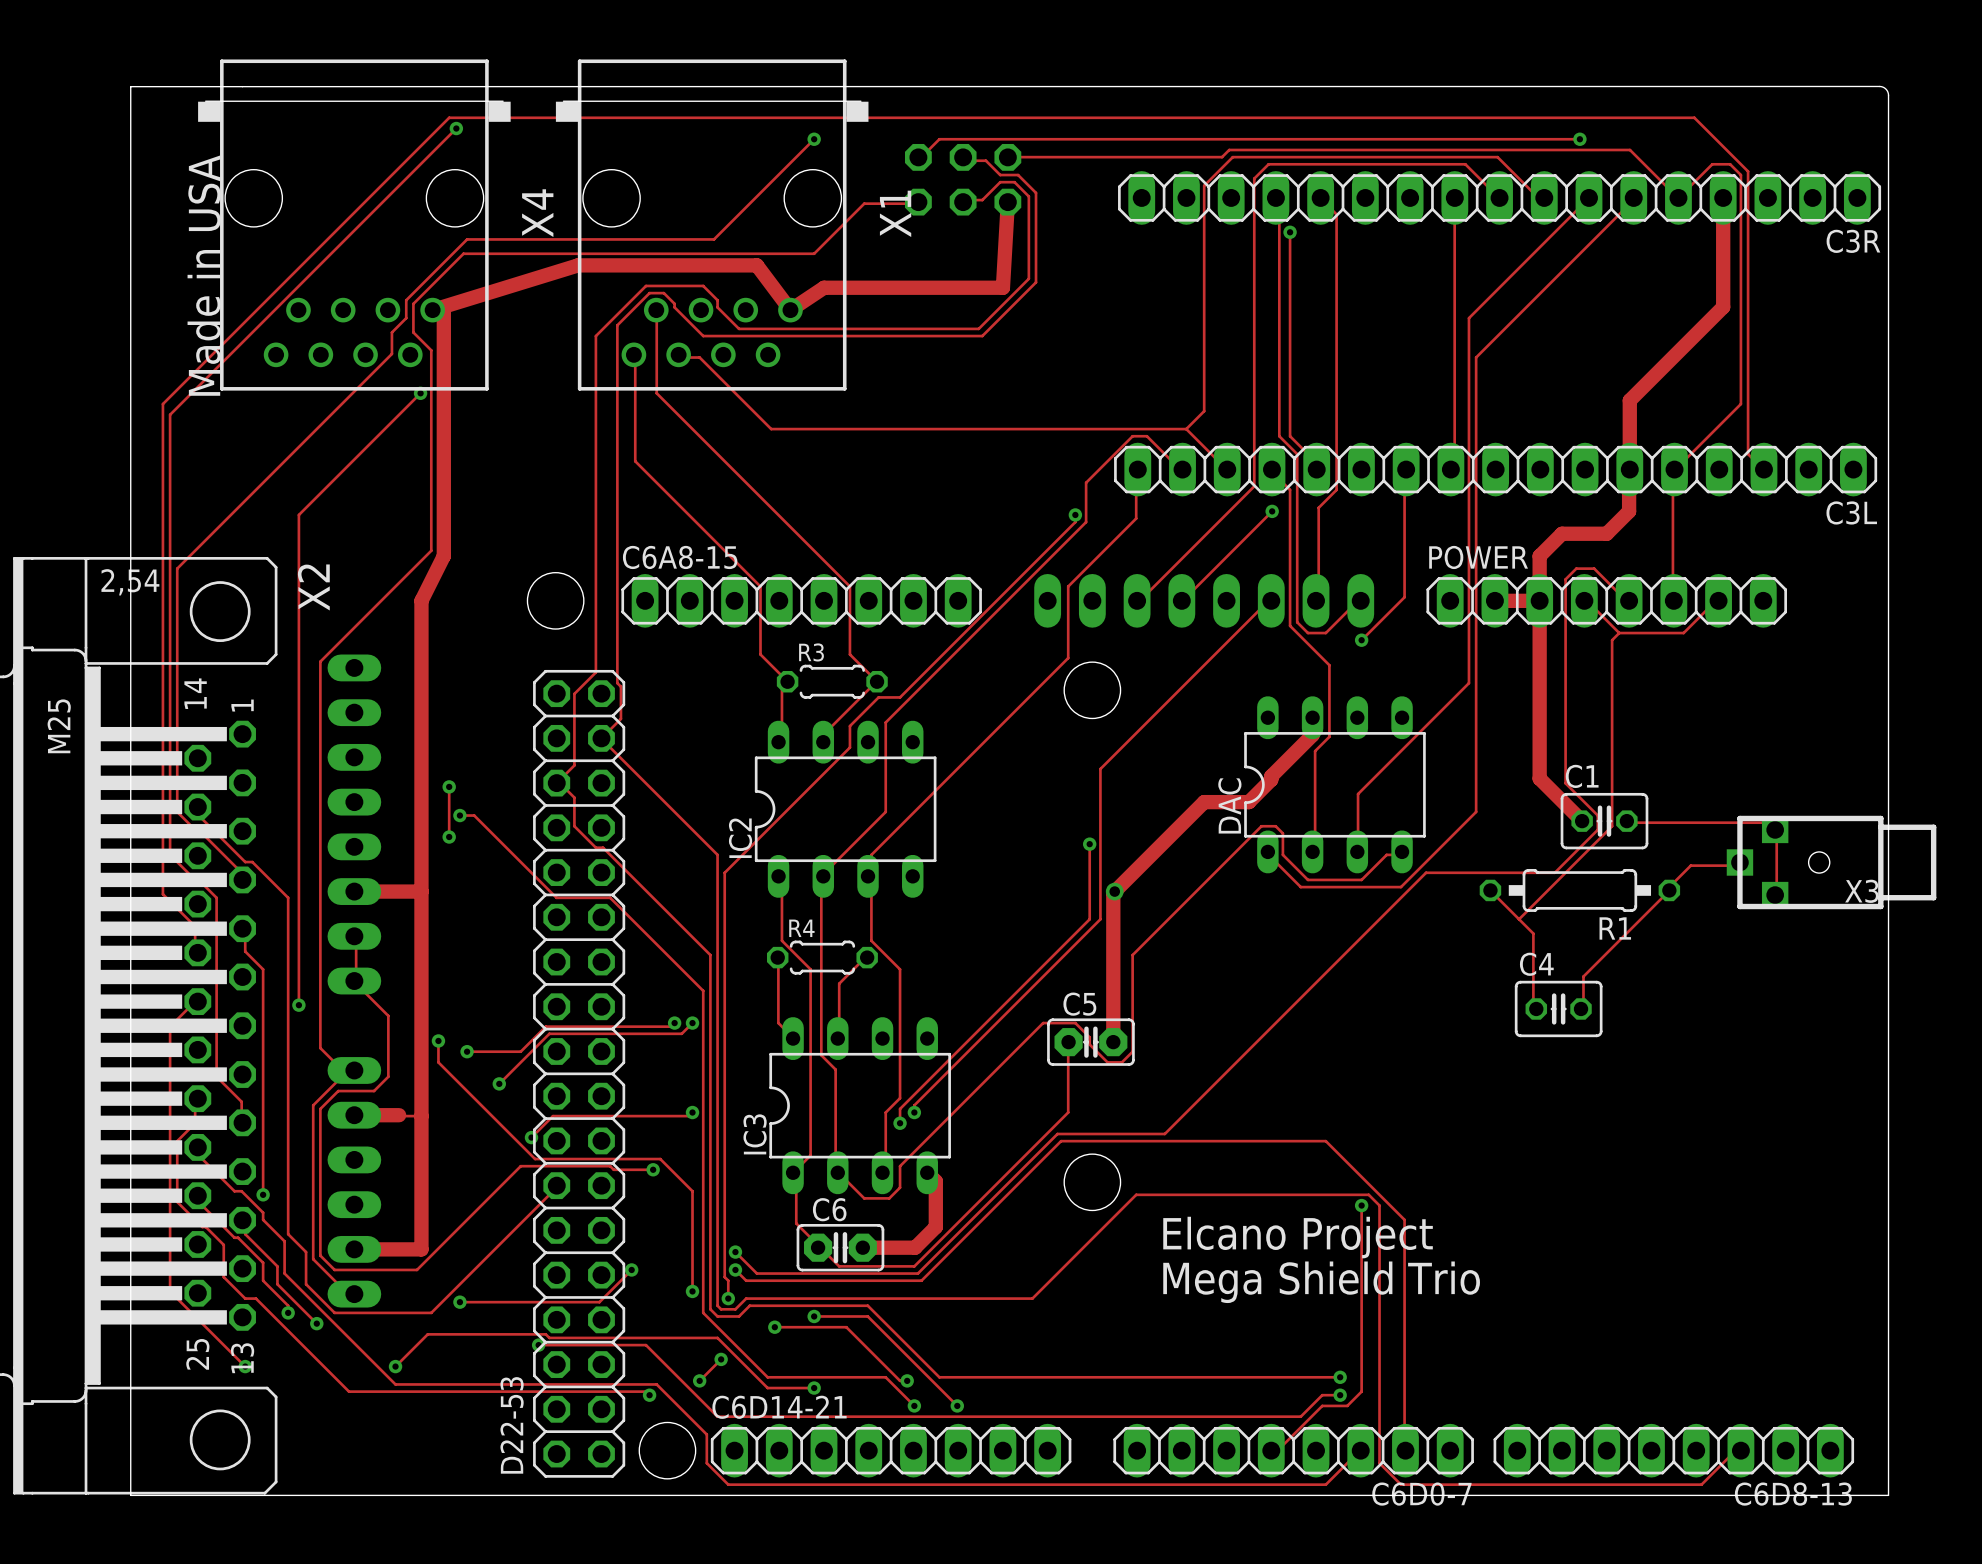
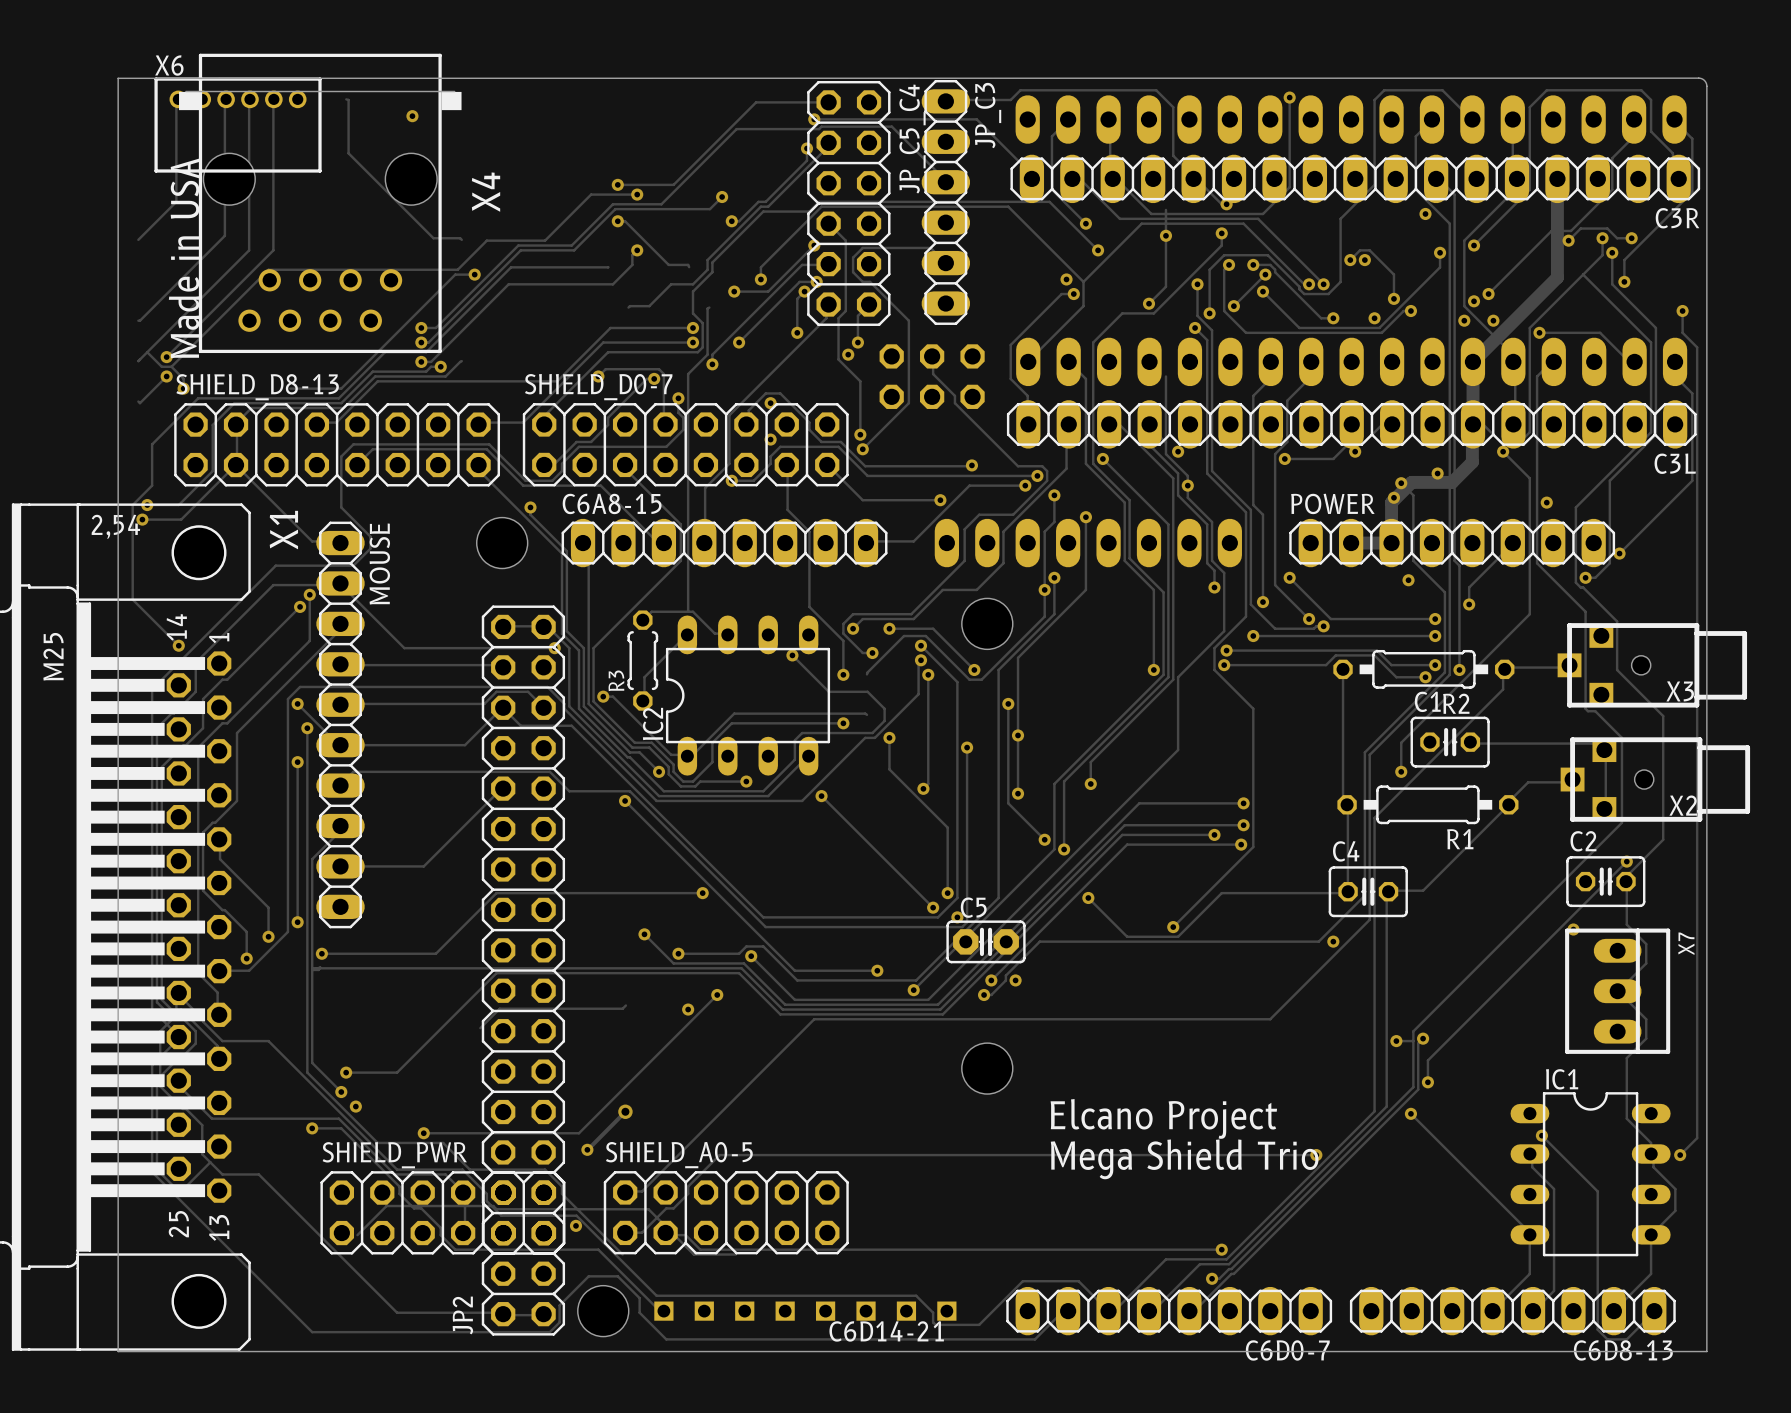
track: none -> (1289, 97) (1289, 187) (1262, 213) (1151, 213) (1109, 171) (1110, 121) (1108, 119)
via: none -> (1289, 97)
track: none -> (178, 99) (176, 99) (176, 201) (138, 239)
track: none -> (226, 99) (224, 235) (138, 320)
track: none -> (249, 99) (249, 250) (138, 361)
track: none -> (273, 99) (273, 250) (166, 357)
track: none -> (346, 99) (348, 99) (348, 153) (433, 238) (460, 238) (461, 239)
track: none -> (945, 101) (1010, 99) (1020, 90) (1156, 90) (1173, 107) (1173, 155) (1221, 204) (1226, 204)
track: none -> (828, 102) (756, 102) (673, 184) (617, 184)
track: (456, 128) (170, 414) (170, 854) (216, 897) (216, 1076) (241, 1101) (242, 1122) -> (309, 594) (309, 640) (227, 723) (222, 723) (198, 747) (198, 973) (217, 992) (217, 1014) (219, 1014)
track: none -> (814, 119) (976, 119) (1028, 171)
via: none -> (814, 119)
track: none -> (1068, 119) (1051, 136) (1051, 189) (1085, 223)
part: none -> (1351, 119)
track: none -> (1431, 119) (1415, 136) (1415, 189) (1449, 223) (1449, 674) (1369, 754) (1369, 919) (1270, 1019) (814, 1019) (642, 1191) (625, 1192)
track: none -> (1472, 119) (1442, 90) (1384, 90) (1374, 99) (1374, 184) (1340, 218) (1340, 281) (1328, 294) (1304, 294) (1267, 255) (1224, 255) (1209, 269) (1209, 313)
track: none -> (1512, 119) (1512, 192) (1464, 240) (1464, 306) (1512, 354) (1513, 361) (1515, 361) (1515, 412) (1513, 413)
track: none -> (1634, 119) (1634, 136) (1612, 158) (1612, 189) (1571, 230) (1551, 230) (1488, 294)
track: none -> (1674, 119) (1692, 138) (1692, 192) (1624, 260) (1624, 281)
X6: none -> (238, 125)
track: (814, 139) (713, 239) (467, 239) (406, 300) (406, 318) (391, 332) (391, 353) (177, 568) (177, 811) (191, 826) (195, 826) (241, 872) (242, 879) -> none
via: (814, 139) -> none
track: (1579, 139) (939, 139) (921, 157) (918, 157) -> none
via: (1579, 139) -> none
track: (963, 157) (964, 160) (985, 160) (1000, 175) (1018, 175) (1036, 192) (1036, 282) (982, 336) (703, 336) (674, 307) (674, 303) (663, 293) (649, 293) (617, 325) (617, 683) (620, 686) (620, 718) (601, 738) (717, 854) (717, 1305) (721, 1309) (735, 1309) (746, 1298) (1032, 1298) (1136, 1194) (1368, 1194) (1379, 1205) (1379, 1463) (1400, 1484) (1701, 1484) (1733, 1452) (1740, 1452) (1740, 1450) -> none
track: (1007, 157) (1222, 157) (1229, 149) (1630, 149) (1678, 197) (1712, 164) (1730, 164) (1740, 175) (1740, 404) (1672, 472) (1673, 600) -> (1469, 604) (1469, 587) (1512, 543)
track: none -> (828, 142) (826, 143) (826, 148) (768, 206) (760, 206) (707, 260) (707, 269) (693, 284) (671, 284) (649, 306) (628, 307)
track: none -> (807, 148) (807, 160) (765, 201) (758, 201) (739, 221) (731, 221)
via: none -> (807, 148)
part position: (963, 179) -> (932, 376)
track: none -> (1068, 171) (1073, 172) (1119, 218) (1258, 218) (1323, 284)
track: none -> (1432, 171) (1454, 194) (1454, 560) (1459, 565) (1459, 669)
track: none -> (1674, 171) (1672, 170) (1672, 153) (1651, 131) (1651, 99) (1641, 90) (1546, 90) (1529, 107) (1529, 189) (1474, 245)
track: (1275, 197) (1279, 200) (1279, 436) (1297, 454) (1297, 622) (1307, 633) (1325, 633) (1358, 600) (1360, 600) -> none
track: (1320, 197) (1336, 214) (1336, 489) (1318, 507) (1318, 600) (1316, 600) -> none
track: (1454, 197) (1454, 464) (1450, 469) -> none
track: (1499, 197) (1465, 164) (1268, 164) (1254, 178) (1254, 486) (1139, 600) (1137, 600) -> none
track: (1544, 197) (1536, 196) (1497, 157) (1232, 157) (1204, 185) (1204, 411) (1186, 429) -> none
track: (1589, 197) (1468, 318) (1468, 683) (1358, 794) (1357, 851) -> none
track: (1633, 197) (1476, 357) (1476, 811) (1400, 887) (1300, 887) (1268, 854) (1267, 851) -> none
track: none -> (945, 182) (891, 126) (736, 129) (661, 204) (612, 204) (571, 245) (518, 245) (435, 327) (421, 327)
track: (918, 202) (917, 203) (864, 203) (814, 253) (463, 253) (413, 303) (413, 332) (431, 350) (431, 550) (320, 661) (320, 1048) (345, 1073) (313, 1105) (313, 1259) (345, 1291) (352, 1291) (354, 1294) -> none
track: (963, 202) (964, 200) (982, 200) (1000, 182) (1014, 182) (1028, 196) (1028, 278) (978, 328) (739, 328) (717, 307) (717, 300) (703, 285) (645, 285) (595, 336) (595, 672) (574, 693) (574, 765) (556, 783) (560, 783) (574, 797) (574, 826) (595, 847) (603, 847) (710, 955) (710, 1309) (717, 1316) (739, 1316) (749, 1305) (867, 1305) (939, 1377) (1340, 1377) -> none
track: (1007, 202) (1002, 287) (824, 287) (790, 310) (756, 265) (578, 265) (432, 310) (443, 310) (443, 556) (421, 600) (421, 1249) (354, 1249) -> none
via: none -> (617, 184)
track: none -> (637, 194) (591, 194) (545, 240) (486, 240) (457, 269) (268, 269) (171, 366)
via: none -> (637, 194)
track: none -> (722, 197) (709, 209) (615, 209) (574, 250) (520, 250) (428, 342) (421, 342)
via: none -> (722, 197)
JP_C3: none -> (945, 202)
X1: (712, 225) -> none
JP_C5_C4: none -> (848, 203)
via: none -> (1226, 204)
via position: (1290, 232) -> (1165, 235)
via: none -> (1425, 213)
track: none -> (617, 221) (625, 221) (668, 264) (688, 264) (689, 267)
via: none -> (617, 221)
via: none -> (731, 221)
track: none -> (828, 223) (845, 240) (845, 311) (838, 318) (838, 359) (860, 381) (860, 434)
via: none -> (1085, 223)
track: none -> (1221, 233) (1221, 245) (1153, 313) (1122, 313) (1093, 342) (1093, 463) (1129, 500) (1129, 558) (1163, 592) (1163, 674) (1054, 783) (1054, 849) (913, 990)
via: none -> (1221, 233)
track: none -> (1602, 238) (1602, 255) (1529, 327) (1529, 432) (1520, 441) (1500, 441) (1474, 415) (1472, 361)
via: none -> (1602, 238)
track: none -> (1631, 238) (1617, 238) (1607, 228) (1580, 228) (1568, 240)
via: none -> (1631, 238)
via: none -> (1568, 240)
track: none -> (814, 245) (768, 291) (734, 291)
via: none -> (814, 245)
via: none -> (1474, 245)
track: none -> (637, 250) (632, 255) (632, 264) (612, 284) (508, 284) (431, 361) (421, 361)
via: none -> (637, 250)
track: none -> (1098, 250) (1049, 201) (819, 201) (809, 211) (763, 211) (712, 262) (712, 272) (693, 291) (693, 313) (702, 323) (702, 347) (697, 352) (608, 352) (545, 415) (544, 424)
via: none -> (1098, 250)
track: none -> (1440, 252) (1440, 267) (1379, 327) (1299, 327) (1262, 291)
via: none -> (1440, 252)
track: none -> (1612, 252) (1612, 284) (1655, 327) (1655, 434) (1609, 480) (1609, 563) (1595, 577) (1585, 577)
via: none -> (1612, 252)
track: none -> (1350, 260) (1360, 250) (1369, 250) (1393, 274) (1393, 298)
via: none -> (1350, 260)
via: none -> (1364, 260)
track: none -> (945, 263) (930, 247) (862, 247) (853, 257) (853, 272) (862, 281) (870, 281) (908, 320) (908, 403) (862, 449)
track: none -> (828, 264) (802, 264) (712, 354) (712, 364)
track: none -> (1229, 264) (1224, 269) (1224, 311) (1246, 332) (1381, 332) (1403, 311) (1410, 311)
via: none -> (1229, 264)
track: none -> (1253, 264) (1270, 264) (1275, 272) (1321, 318) (1333, 318)
via: none -> (1253, 264)
track: none -> (608, 267) (511, 267) (426, 352) (384, 352) (338, 398) (198, 398) (152, 444) (152, 485) (132, 505) (132, 599) (178, 645)
track: none -> (474, 274) (455, 274) (341, 388) (290, 388)
via: none -> (474, 274)
track: none -> (1265, 274) (1233, 306)
via: none -> (1265, 274)
track: none -> (1583, 274) (1651, 342) (1651, 432) (1575, 507) (1575, 582) (1617, 621) (1617, 669) (1663, 716) (1663, 839) (1626, 876) (1626, 881) (1626, 924) (1646, 944) (1646, 963) (1617, 991) (1646, 1019) (1646, 1038) (1626, 1058) (1626, 1118) (1651, 1142) (1653, 1167) (1675, 1189) (1675, 1210) (1651, 1234)
track: none -> (760, 279) (760, 267) (821, 206) (1008, 206) (1083, 281)
via: none -> (760, 279)
via: none -> (1066, 279)
track: (656, 310) (656, 393) (849, 586) (849, 654) (877, 681) (824, 733) (823, 742) -> none
track: none -> (816, 281) (799, 281) (739, 342)
via: none -> (816, 281)
track: none -> (1083, 281) (1083, 306) (1028, 361)
track: none -> (1083, 281) (1141, 223) (1243, 223) (1304, 284) (1309, 284)
via: none -> (1624, 281)
track: none -> (1197, 284) (1197, 315) (1212, 330) (1212, 471) (1250, 509) (1250, 604) (1275, 628) (1313, 628) (1316, 626) (1323, 626)
via: none -> (1197, 284)
via: none -> (1309, 284)
via: none -> (1323, 284)
track: (1290, 317) (1290, 416) -> (1165, 286) (1148, 303)
via: none -> (734, 291)
track: none -> (804, 291) (797, 298) (797, 332)
via: none -> (804, 291)
via: none -> (1262, 291)
track: none -> (1073, 294) (1061, 294) (1010, 344) (1010, 378) (1027, 395) (1028, 413)
via: none -> (1073, 294)
via: none -> (1488, 294)
via: none -> (1393, 298)
via: none -> (1474, 301)
track: none -> (828, 304) (826, 306) (826, 318) (729, 415) (729, 463) (705, 488) (704, 543)
track: none -> (869, 304) (857, 315) (857, 342)
via: none -> (1148, 303)
via: none -> (1233, 306)
track: none -> (709, 307) (707, 308) (707, 354) (688, 374) (688, 611)
via: none -> (1410, 311)
track: none -> (1682, 311) (1682, 332) (1697, 347) (1697, 1138) (1680, 1155)
via: none -> (1682, 311)
via: none -> (1209, 313)
via: none -> (1333, 318)
via: none -> (1374, 318)
track: (633, 354) (635, 461) (760, 586) (760, 654) (787, 681) (781, 686) (781, 740) (778, 742) -> none
track: (678, 354) (681, 357) (699, 357) (771, 429) (1186, 429) -> none
via: none -> (1464, 320)
via: none -> (1493, 320)
via: none -> (421, 327)
track: none -> (693, 327) (610, 327) (557, 381) (377, 381) (336, 422) (317, 422) (316, 424)
via: none -> (693, 327)
track: none -> (1195, 327) (1207, 340) (1207, 473) (1246, 512) (1246, 616) (1214, 648) (1214, 669) (1253, 708) (1253, 847) (1173, 927)
via: none -> (1195, 327)
via: none -> (797, 332)
track: none -> (1539, 332) (1600, 332) (1626, 359) (1634, 359) (1634, 361)
via: none -> (1539, 332)
via: none -> (421, 342)
track: none -> (693, 342) (603, 342) (523, 422) (479, 422) (478, 424)
via: none -> (693, 342)
via: none -> (739, 342)
via: none -> (857, 342)
track: none -> (147, 352) (161, 366) (171, 366)
via: none -> (848, 354)
track: (420, 393) (298, 514) (298, 1005) -> none
via: (420, 393) -> none
track: none -> (932, 356) (933, 374) (954, 395) (954, 403) (1018, 466) (1042, 466) (1047, 471) (1047, 480) (1013, 514) (979, 514) (964, 529) (964, 560) (911, 614) (853, 614) (843, 623) (843, 633) (862, 653) (872, 653)
via: none -> (166, 357)
track: none -> (461, 361) (445, 376) (375, 376) (343, 408) (251, 408) (236, 424) (236, 465)
via: none -> (421, 361)
track: none -> (1068, 361) (1085, 378) (1085, 463) (1124, 502) (1124, 560) (1153, 589) (1153, 669)
track: none -> (1270, 361) (1270, 378) (1253, 395) (1253, 505) (1262, 514) (1262, 602)
track: none -> (1311, 361) (1309, 361) (1309, 378) (1287, 400) (1287, 441) (1275, 454) (1275, 585) (1309, 619)
part: none -> (1351, 361)
track: none -> (1553, 361) (1537, 376) (1537, 563) (1585, 611) (1585, 708) (1588, 711) (1595, 711) (1621, 737) (1621, 822) (1413, 1031) (1413, 1087) (1231, 1269) (1229, 1269) (1219, 1278) (1212, 1278)
track: none -> (1675, 361) (1675, 376) (1692, 393) (1692, 480) (1619, 553)
via: none -> (712, 364)
track: none -> (171, 366) (183, 378) (183, 388)
track: none -> (440, 366) (431, 366) (426, 371) (372, 371) (341, 403) (234, 403) (212, 425) (212, 471) (178, 505) (147, 505)
via: none -> (440, 366)
track: none -> (166, 376) (139, 403) (138, 401)
via: none -> (166, 376)
track: none -> (598, 376) (605, 369) (659, 369) (663, 374) (663, 422) (665, 424)
via: none -> (598, 376)
track: none -> (654, 378) (646, 378) (608, 417) (608, 425) (591, 441) (576, 441) (554, 463) (544, 464)
via: none -> (654, 378)
via: none -> (183, 388)
track: (1186, 429) (1227, 469) -> none
track: (1290, 436) (1315, 461) (1316, 469) -> (1165, 394) (1165, 442)
track: none -> (678, 398) (678, 412) (683, 417) (683, 429) (666, 446) (579, 446) (562, 463) (562, 471) (552, 480) (525, 480) (489, 444) (353, 444) (341, 456) (341, 507) (370, 536) (370, 548) (353, 565) (275, 565) (152, 689) (152, 1009) (178, 1036) (178, 1038) (152, 1065) (152, 1172) (312, 1332) (549, 1332) (559, 1322) (559, 1305) (588, 1276) (617, 1276) (639, 1298) (639, 1312) (666, 1339) (1034, 1339) (1061, 1312) (1068, 1311)
via: none -> (678, 398)
via: none -> (770, 403)
track: none -> (1068, 413) (1066, 415) (1066, 468) (1003, 531) (1003, 563) (976, 589) (942, 589) (913, 619) (862, 619) (853, 628)
track: none -> (1109, 413) (1173, 478) (1173, 679) (1090, 762) (1090, 783)
track: none -> (1149, 413) (1151, 415) (1151, 446) (1178, 473) (1178, 495) (1207, 524) (1207, 563) (1214, 570) (1214, 587)
track: none -> (1392, 413) (1364, 441) (1350, 441) (1333, 458) (1284, 458)
track: none -> (746, 424) (748, 422) (748, 410) (765, 393) (780, 393) (809, 422) (809, 429) (821, 441) (840, 441) (865, 466) (976, 466)
track: (1137, 469) (1136, 472) (1136, 518) (1068, 586) (1068, 658) (871, 854) (871, 872) (868, 876) (871, 876) (871, 940) (900, 969) (900, 1098) (885, 1112) (885, 1169) (882, 1172) -> none
track: (1182, 469) (1146, 436) (1132, 436) (1086, 482) (1086, 522) (885, 722) (885, 811) (821, 876) (821, 1055) (835, 1069) (835, 1169) (864, 1198) (889, 1198) (900, 1187) (900, 1166) (1043, 1023) (1075, 1023) (1089, 1037) (1089, 1044) (1107, 1062) (1121, 1062) (1132, 1051) (1132, 955) (1261, 826) (1275, 826) (1282, 833) (1282, 854) (1307, 879) (1361, 879) (1386, 854) (1400, 854) (1402, 851) -> none
track: (1406, 469) (1404, 472) (1404, 597) (1361, 640) -> none
track: (1763, 469) (1748, 454) (1748, 171) (1694, 117) (449, 117) (162, 404) (162, 894) (195, 926) (195, 951) (197, 952) -> none
via: none -> (860, 434)
via: none -> (770, 439)
SHIELD_D8-13: none -> (337, 444)
SHIELD_D0-7: none -> (685, 444)
via: none -> (862, 449)
via: none -> (1178, 451)
via: none -> (1355, 451)
track: none -> (1503, 451) (1529, 478) (1529, 614) (1401, 742) (1401, 771)
via: none -> (1503, 451)
track: (1290, 502) (1290, 625) (1329, 665) (1329, 736) (1315, 751) (1315, 851) (1312, 851) -> (1165, 454) (1187, 475) (1187, 497) (1212, 522) (1212, 560) (1224, 572) (1224, 631) (1178, 677) (1178, 750) (928, 999) (794, 999) (751, 956)
track: none -> (1102, 458) (1168, 524) (1168, 677) (1064, 781) (1064, 849)
via: none -> (1102, 458)
via: none -> (1284, 458)
track: (1272, 511) (1181, 600) -> none
via: (1272, 511) -> none
track: none -> (236, 465) (312, 541) (338, 541) (340, 543)
track: none -> (236, 465) (181, 519) (142, 519)
track: none -> (357, 465) (372, 449) (486, 449) (523, 485) (600, 485) (656, 541) (663, 541) (663, 543)
track: none -> (478, 465) (479, 471) (562, 553) (562, 633) (579, 650) (579, 708) (663, 791) (763, 791) (794, 759) (794, 740) (802, 733) (872, 733) (884, 720) (884, 708) (867, 691) (828, 691) (792, 655)
track: none -> (625, 464) (627, 466) (627, 471) (680, 524) (680, 560) (593, 648) (593, 701) (634, 742) (651, 742) (673, 764) (673, 771) (683, 781) (693, 781) (712, 762) (712, 742) (731, 723) (843, 723)
track: none -> (786, 464) (787, 509) (809, 531) (809, 606) (843, 640) (843, 674)
track: none -> (827, 464) (862, 500) (940, 500)
track: (1075, 514) (1075, 522) (900, 697) (878, 697) (849, 726) (849, 747) (724, 872) (724, 1277) (728, 1280) (728, 1298) -> none
via: none -> (1437, 473)
track: none -> (1037, 475) (867, 475) (838, 446) (780, 446) (770, 456) (770, 463) (753, 480) (731, 480)
via: none -> (1037, 475)
via: none -> (731, 480)
track: none -> (1401, 483) (1413, 495) (1413, 560) (1444, 592) (1444, 672) (1364, 752) (1364, 895) (1318, 941) (1039, 941) (1005, 975) (1005, 980) (991, 994) (984, 994)
via: none -> (1401, 483)
track: none -> (1025, 485) (969, 485) (913, 541) (867, 541) (866, 543)
via: none -> (1025, 485)
via: none -> (1187, 485)
track: none -> (1054, 495) (1054, 522) (1044, 531) (1044, 616) (981, 679) (969, 679) (925, 636) (904, 636) (866, 674)
via: none -> (1054, 495)
via: none -> (1393, 497)
via: none -> (940, 500)
via: none -> (1546, 502)
via: none -> (147, 505)
track: none -> (530, 507) (530, 514) (566, 551) (566, 631) (583, 648) (583, 706) (629, 752) (639, 752) (659, 771)
via: none -> (530, 507)
track: none -> (1085, 517) (1085, 589) (1018, 657) (1018, 793)
via: none -> (1085, 517)
via: none -> (142, 519)
X2 name: X2 (313, 587) -> X1 (283, 530)
track: none -> (583, 543) (588, 548) (588, 703) (632, 747) (649, 747) (668, 767) (668, 774) (680, 786) (695, 786) (700, 781) (746, 781)
track: (1271, 600) (1268, 600) (1100, 769) (1100, 919) (914, 1105) (914, 1112) -> none
track: (1584, 600) (1587, 600) (1619, 633) -> none
track: (1629, 600) (1626, 600) (1594, 568) (1576, 568) (1565, 579) (1565, 783) (1597, 815) (1597, 829) (1554, 872) (1426, 872) (1164, 1133) (1057, 1133) (917, 1273) (756, 1273) (735, 1252) -> none
track: (1718, 600) (1715, 600) (1683, 633) (1619, 633) -> none
track: (1539, 601) (1539, 778) (1582, 821) -> none
via: none -> (1619, 553)
track: (1619, 633) (1612, 640) (1612, 826) (1519, 919) -> none
track: none -> (1054, 577) (1054, 614) (998, 669) (998, 897) (916, 980) (797, 980) (763, 946) (746, 946) (739, 953) (678, 953)
via: none -> (1054, 577)
track: none -> (1289, 577) (1330, 619) (1435, 619)
via: none -> (1289, 577)
via: none -> (1585, 577)
via position: (1361, 640) -> (1214, 587)
via: none -> (1408, 580)
R3 name position: R3 (811, 652) -> R3 (616, 680)
via: none -> (1044, 589)
via: none -> (309, 594)
via: none -> (1262, 602)
via: none -> (1469, 604)
track: none -> (300, 606) (227, 679) (222, 679) (203, 699) (203, 728) (161, 767) (161, 999) (171, 1009) (181, 1009) (217, 1045) (217, 1058) (219, 1058)
via: none -> (300, 606)
R3 rotation: 0° (832, 681) -> 90° clockwise (642, 660)
R3 position: (832, 681) -> (642, 660)
via: none -> (1309, 619)
via: none -> (1435, 619)
track: none -> (642, 620) (651, 611) (693, 611) (714, 633) (727, 634)
track: none -> (340, 623) (338, 623) (338, 631) (237, 733) (237, 800) (203, 832) (203, 890) (246, 931) (246, 958)
via: none -> (1323, 626)
track: none -> (503, 626) (542, 626) (545, 628) (549, 628) (569, 648) (569, 706) (659, 796) (768, 796) (808, 756)
via: none -> (853, 628)
track: none -> (889, 628) (933, 628) (974, 669)
via: none -> (889, 628)
track: none -> (687, 634) (644, 677) (644, 699) (642, 701)
track: none -> (1253, 636) (1435, 636)
via: none -> (1253, 636)
via: none -> (1435, 636)
via: none -> (178, 645)
track: none -> (921, 645) (957, 682) (957, 897) (937, 917) (763, 917) (571, 725) (520, 725) (503, 707) (465, 745) (338, 745) (297, 703)
via: none -> (921, 645)
track: none -> (554, 648) (404, 648) (340, 583) (338, 585) (273, 585) (195, 662) (195, 691) (156, 728) (156, 1002) (173, 1019) (183, 1019) (195, 1031) (195, 1043) (156, 1079) (156, 1169) (173, 1186) (186, 1186) (210, 1162)
via: none -> (554, 648)
track: (1312, 717) (1312, 735) (1271, 776) (1271, 779) (1248, 802) (1204, 802) (1113, 893) (1113, 1042) -> none
track: none -> (1226, 650) (1376, 650) (1391, 665) (1435, 665)
via: none -> (1226, 650)
via: none -> (872, 653)
via: none -> (792, 655)
track: none -> (921, 660) (918, 662) (918, 694) (874, 737) (865, 737) (802, 800) (656, 800) (564, 708) (564, 703) (547, 686) (300, 686) (287, 699) (287, 931) (249, 970) (219, 971)
via: none -> (921, 660)
track: none -> (340, 664) (501, 665) (503, 667)
track: none -> (1224, 665) (1326, 665) (1335, 655) (1374, 655) (1396, 677) (1425, 677)
via: none -> (1224, 665)
via: none -> (1435, 665)
track: none -> (1569, 665) (1568, 667) (1505, 667) (1503, 669) (1503, 689) (1374, 817) (1374, 1111) (1226, 1259) (1165, 1259) (1115, 1310) (1108, 1311) (1078, 1281) (1022, 1281) (979, 1324) (935, 1324) (933, 1322) (933, 1312) (916, 1295) (656, 1295) (576, 1215)
X3: none -> (1652, 665)
track: none -> (1343, 669) (1343, 800) (1347, 805) (1347, 893) (1221, 893) (1178, 936) (1127, 936) (1088, 897)
R2: none -> (1423, 669)
via: none -> (974, 669)
via: none -> (1153, 669)
via: none -> (1459, 669)
via: none -> (843, 674)
track: none -> (928, 674) (928, 783) (923, 788)
via: none -> (928, 674)
via: none -> (1425, 677)
track: none -> (603, 696) (612, 696) (671, 754) (687, 756) (693, 754) (734, 713) (866, 714)
via: none -> (603, 696)
via: none -> (297, 703)
track: none -> (1008, 703) (1008, 803) (1044, 839)
via: none -> (1008, 703)
track: none -> (340, 704) (484, 703) (496, 691) (528, 691) (543, 707)
DAC: (1334, 784) -> none
track: (449, 786) (449, 837) -> none
via: (449, 786) -> none
via: none -> (843, 723)
MOUSE: none -> (340, 724)
via: none -> (307, 728)
track: (197, 807) (198, 815) (245, 862) (252, 862) (288, 897) (288, 1234) (306, 1252) (306, 1284) (334, 1312) (431, 1312) (556, 1185) -> none
IC2 position: (845, 809) -> (748, 695)
via: none -> (1018, 735)
track: (459, 815) (474, 815) (556, 897) (610, 897) (703, 990) (703, 1312) (767, 1377) (885, 1377) (914, 1405) -> none
via: (459, 815) -> none
track: none -> (889, 737) (889, 769) (947, 827) (947, 893)
via: none -> (889, 737)
part: (354, 824) -> none
track: none -> (967, 747) (967, 922) (962, 927) (765, 927) (629, 791) (569, 791) (549, 771) (353, 771) (340, 785)
via: none -> (967, 747)
via: (449, 837) -> none
track: none -> (297, 762) (297, 922)
via: none -> (297, 762)
track: (1089, 844) (1089, 919) (900, 1108) (900, 1123) -> none
via: (1089, 844) -> none
via: none -> (659, 771)
via: none -> (1401, 771)
via: none -> (746, 781)
via: none -> (1090, 783)
track: none -> (503, 788) (423, 866) (340, 866)
via: none -> (923, 788)
track: (778, 876) (781, 876) (781, 940) (810, 969) (810, 1155) (793, 1172) (796, 1173) (796, 1223) (817, 1244) (818, 1247) (821, 1248) (839, 1266) (914, 1266) (1068, 1112) (1068, 1042) -> none
via: none -> (1018, 793)
track: none -> (821, 796) (933, 907)
via: none -> (821, 796)
track: none -> (625, 800) (794, 970) (877, 970)
via: none -> (625, 800)
track: none -> (1243, 803) (1139, 803) (937, 1004) (785, 1004) (743, 963) (673, 963) (644, 934)
via: none -> (1243, 803)
track: (1490, 890) (1533, 933) (1533, 1008) (1536, 1008) -> none
track: (354, 891) (421, 891) -> none
via: (1114, 891) -> none
X3 name: X3 (1861, 891) -> X2 (1683, 805)
track: none -> (340, 826) (338, 832) (312, 859) (312, 1062) (341, 1092)
track: none -> (1243, 825) (1124, 825) (940, 1009) (782, 1009) (741, 968) (312, 968)
via: none -> (1243, 825)
track: none -> (1214, 834) (1122, 834) (942, 1014) (780, 1014) (739, 973) (496, 973) (397, 1072) (346, 1072)
via: none -> (1214, 834)
track: (243, 929) (245, 930) (245, 951) (263, 969) (263, 1194) -> (220, 839) (220, 859) (268, 907) (268, 936)
via: none -> (1044, 839)
track: none -> (1241, 844) (1127, 844) (991, 980)
via: none -> (1241, 844)
track: (354, 936) (356, 937) (356, 980) (354, 981) (388, 1015) (388, 1076) (374, 1091) (338, 1091) (320, 1108) (320, 1255) (334, 1269) (416, 1269) (520, 1166) (610, 1166) (613, 1169) (653, 1169) -> none
via: none -> (1064, 849)
track: none -> (1626, 861) (1427, 1060) (1427, 1082)
via: none -> (1626, 861)
track: (777, 957) (778, 1023) (793, 1038) -> none
R4: (822, 957) -> none
track: (867, 957) (839, 983) (837, 1038) -> none
C2: none -> (1605, 881)
track: (1583, 976) (1583, 1008) (1581, 1008) -> none
track: none -> (702, 893) (496, 893) (435, 953) (321, 953)
via: none -> (702, 893)
via: none -> (947, 893)
via: none -> (1088, 897)
track: (197, 1001) (195, 1001) (170, 1026) (170, 1291) (245, 1366) -> none
via: none -> (933, 907)
via: (298, 1005) -> none
C4 position: (1558, 1008) -> (1368, 891)
via: none -> (957, 917)
via: none -> (297, 922)
track: (674, 1023) (671, 1026) (545, 1026) (520, 1051) (467, 1051) -> none
via: (674, 1023) -> none
track: (692, 1023) (681, 1033) (549, 1033) (499, 1083) -> none
via: (692, 1023) -> none
via: none -> (1173, 927)
via: none -> (1573, 929)
via: none -> (644, 934)
via: none -> (268, 936)
track: (438, 1040) (438, 1062) (535, 1159) (660, 1159) (692, 1191) (692, 1291) -> none
via: (438, 1040) -> none
via: none -> (1333, 941)
via: (467, 1051) -> none
via: none -> (321, 953)
via: none -> (678, 953)
via: none -> (751, 956)
via: none -> (246, 958)
via: none -> (877, 970)
via: (499, 1083) -> none
via: none -> (991, 980)
via: none -> (1015, 980)
via: none -> (913, 990)
X7: none -> (1617, 991)
track: none -> (717, 994) (579, 1133) (423, 1133)
via: none -> (717, 994)
via: none -> (984, 994)
IC3: (860, 1105) -> none
via: (692, 1112) -> none
via: (914, 1112) -> none
track: (354, 1115) (421, 1116) -> none
via: none -> (688, 1009)
via: (900, 1123) -> none
via: (531, 1137) -> none
track: (197, 1147) (198, 1155) (234, 1191) (241, 1191) (263, 1212) (263, 1219) (284, 1241) (284, 1273) (395, 1384) (656, 1384) (706, 1434) (706, 1463) (728, 1484) (1325, 1484) (1360, 1450) -> none
track: none -> (1423, 1038) (1418, 1043) (1418, 1089) (1233, 1273) (1231, 1273) (1195, 1310) (1189, 1311)
via: none -> (1423, 1038)
track: none -> (1396, 1041) (1413, 1041)
via: none -> (1396, 1041)
via: (653, 1169) -> none
track: (927, 1172) (935, 1181) (935, 1227) (915, 1247) (862, 1247) -> none
part: (354, 1182) -> none
via: none -> (346, 1072)
via: (263, 1194) -> none
via: none -> (1427, 1082)
track: (1361, 1205) (1361, 1391) (1347, 1405) (1322, 1405) (1279, 1448) (1272, 1448) (1271, 1450) -> (1431, 882) (1423, 890) (1389, 890) (1386, 893) (1386, 1106) (1229, 1264) (1199, 1264) (1153, 1310) (1148, 1311)
via: (1361, 1205) -> none
via: none -> (341, 1092)
track: (242, 1220) (245, 1223) (245, 1234) (277, 1266) (277, 1284) (316, 1323) -> none
via: none -> (355, 1106)
track: none -> (625, 1111) (587, 1150)
via: none -> (625, 1111)
track: none -> (1410, 1113) (1529, 1234)
via: none -> (1410, 1113)
track: (238, 1237) (263, 1262) (263, 1280) (288, 1305) (288, 1312) -> (215, 1118) (338, 1118) (394, 1174) (445, 1174) (465, 1193) (465, 1232) (463, 1233)
C6: (840, 1247) -> none
track: none -> (312, 1128) (341, 1128) (399, 1186) (399, 1193) (414, 1208) (421, 1208) (440, 1227) (440, 1235) (455, 1249) (598, 1249) (659, 1310) (663, 1311)
via: none -> (312, 1128)
via: (735, 1252) -> none
track: none -> (1541, 1135) (1597, 1191) (1597, 1329) (1607, 1339) (1626, 1339) (1654, 1311)
via: none -> (1541, 1135)
track: (631, 1269) (599, 1302) (459, 1302) -> none
via position: (631, 1269) -> (587, 1149)
track: (735, 1269) (746, 1280) (921, 1280) (1061, 1141) (1325, 1141) (1404, 1219) (1405, 1450) -> none
via: (735, 1269) -> none
track: none -> (1529, 1154) (1532, 1155) (1532, 1167) (1554, 1189) (1554, 1290) (1533, 1311)
track: none -> (1316, 1155) (719, 1155) (688, 1186) (688, 1193) (673, 1208) (666, 1208) (642, 1232) (625, 1232)
via: none -> (1316, 1155)
via: none -> (1680, 1155)
via: (692, 1291) -> none
track: (245, 1298) (255, 1298) (349, 1391) (645, 1391) (649, 1395) -> (221, 1173) (258, 1174) (397, 1312) (543, 1314)
via: (728, 1298) -> none
IC1: none -> (1590, 1174)
via position: (459, 1302) -> (423, 1133)
via: (288, 1312) -> none
track: (814, 1316) (867, 1316) (957, 1405) -> none
via: (814, 1316) -> none
via: (316, 1323) -> none
track: (774, 1327) (846, 1327) (900, 1380) (907, 1380) -> none
via: (774, 1327) -> none
SHIELD_PWR: none -> (442, 1212)
SHIELD_A0-5: none -> (726, 1212)
track: (538, 1345) (554, 1345) -> (178, 992) (222, 1041) (268, 1041) (397, 1169) (462, 1169) (486, 1193) (486, 1201) (501, 1215)
via: (538, 1345) -> none
track: (637, 1345) (645, 1345) -> (307, 728) (307, 1072) (377, 1142) (443, 1142) (469, 1169) (545, 1169) (562, 1186) (562, 1193) (583, 1215)
via: none -> (576, 1225)
track: (721, 1359) (699, 1380) -> none
via: (721, 1359) -> none
track: none -> (665, 1232) (666, 1235) (685, 1235) (700, 1249) (1221, 1249)
via: (245, 1366) -> none
via: (395, 1366) -> none
track: none -> (1529, 1235) (1529, 1273) (1492, 1311)
track: none -> (1651, 1235) (1651, 1273) (1613, 1311)
via: (1340, 1377) -> none
via: (699, 1380) -> none
via: (907, 1380) -> none
via: none -> (1221, 1249)
track: (688, 1388) (717, 1416) (1300, 1416) (1322, 1395) (1340, 1395) -> none
via: (814, 1388) -> none
via: (649, 1395) -> none
via: (1340, 1395) -> none
via: (914, 1405) -> none
via: (957, 1405) -> none
C6D14-21 name position: C6D14-21 (779, 1407) -> C6D14-21 (886, 1331)
via: none -> (1212, 1278)
C6D14-21 footprint: [710, 1423, 1072, 1478] -> [654, 1301, 957, 1321]
D22-53 name: D22-53 (512, 1425) -> JP2 (462, 1315)

